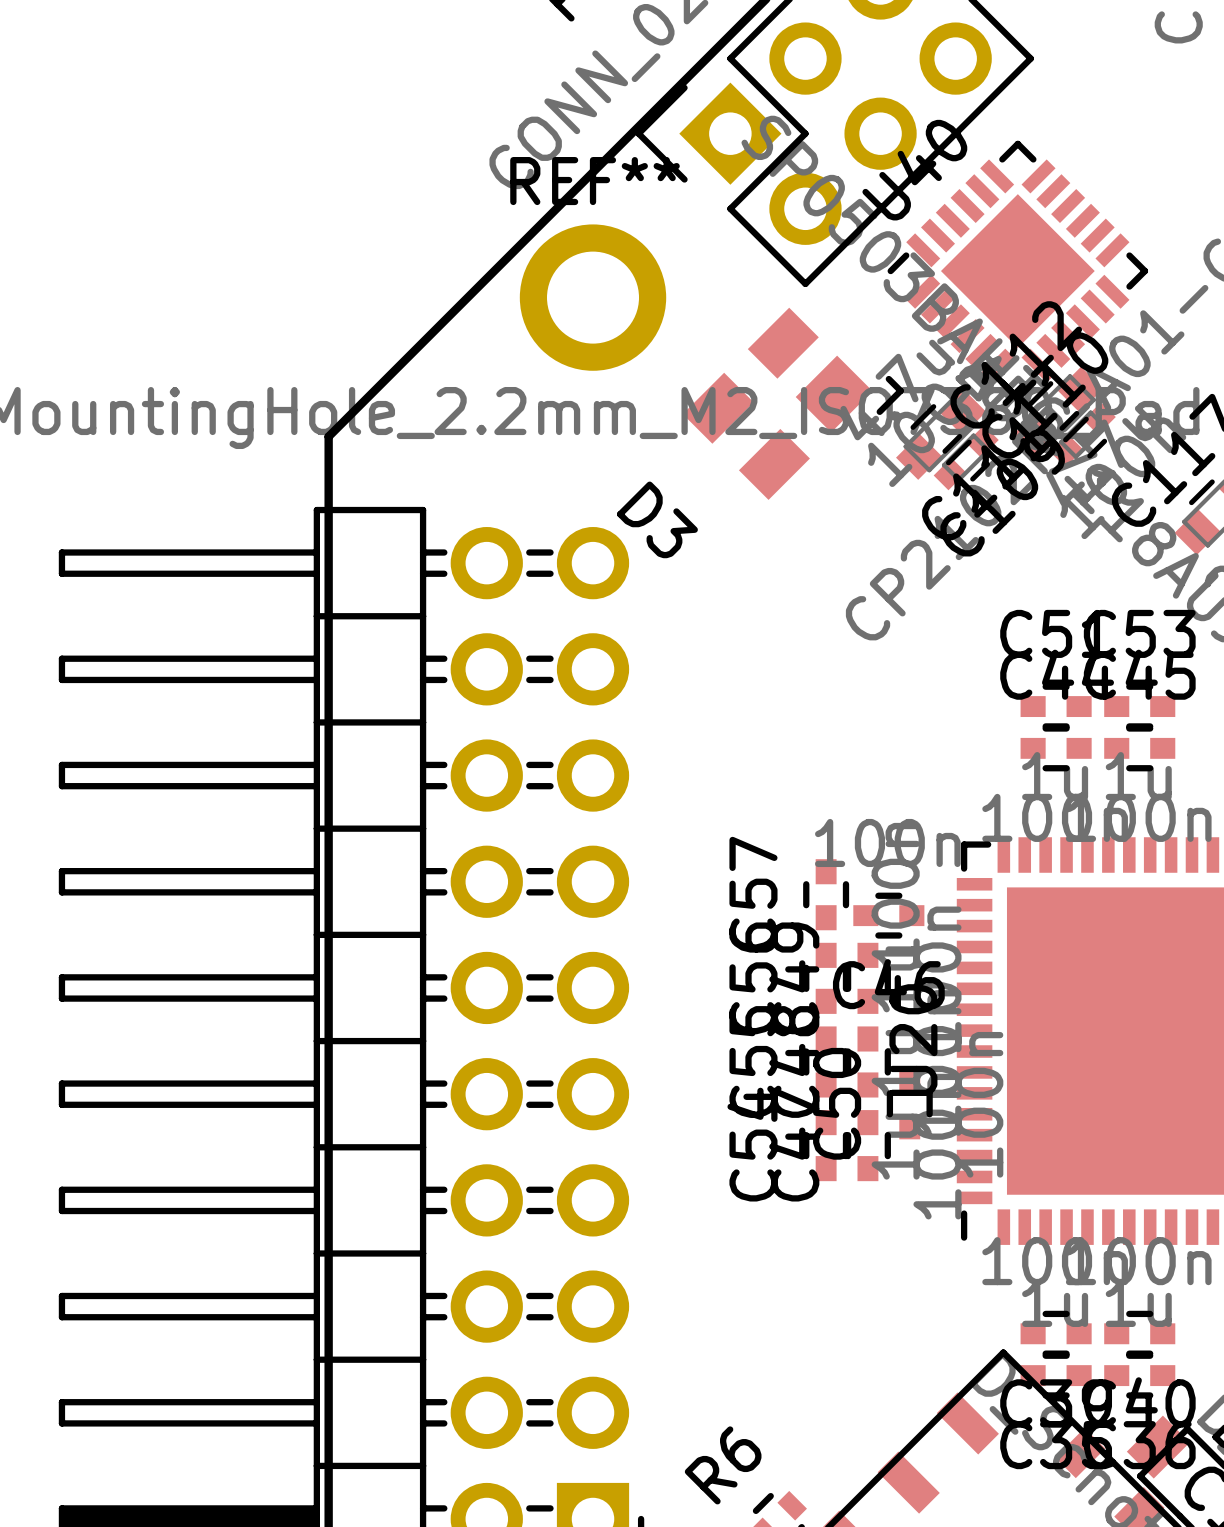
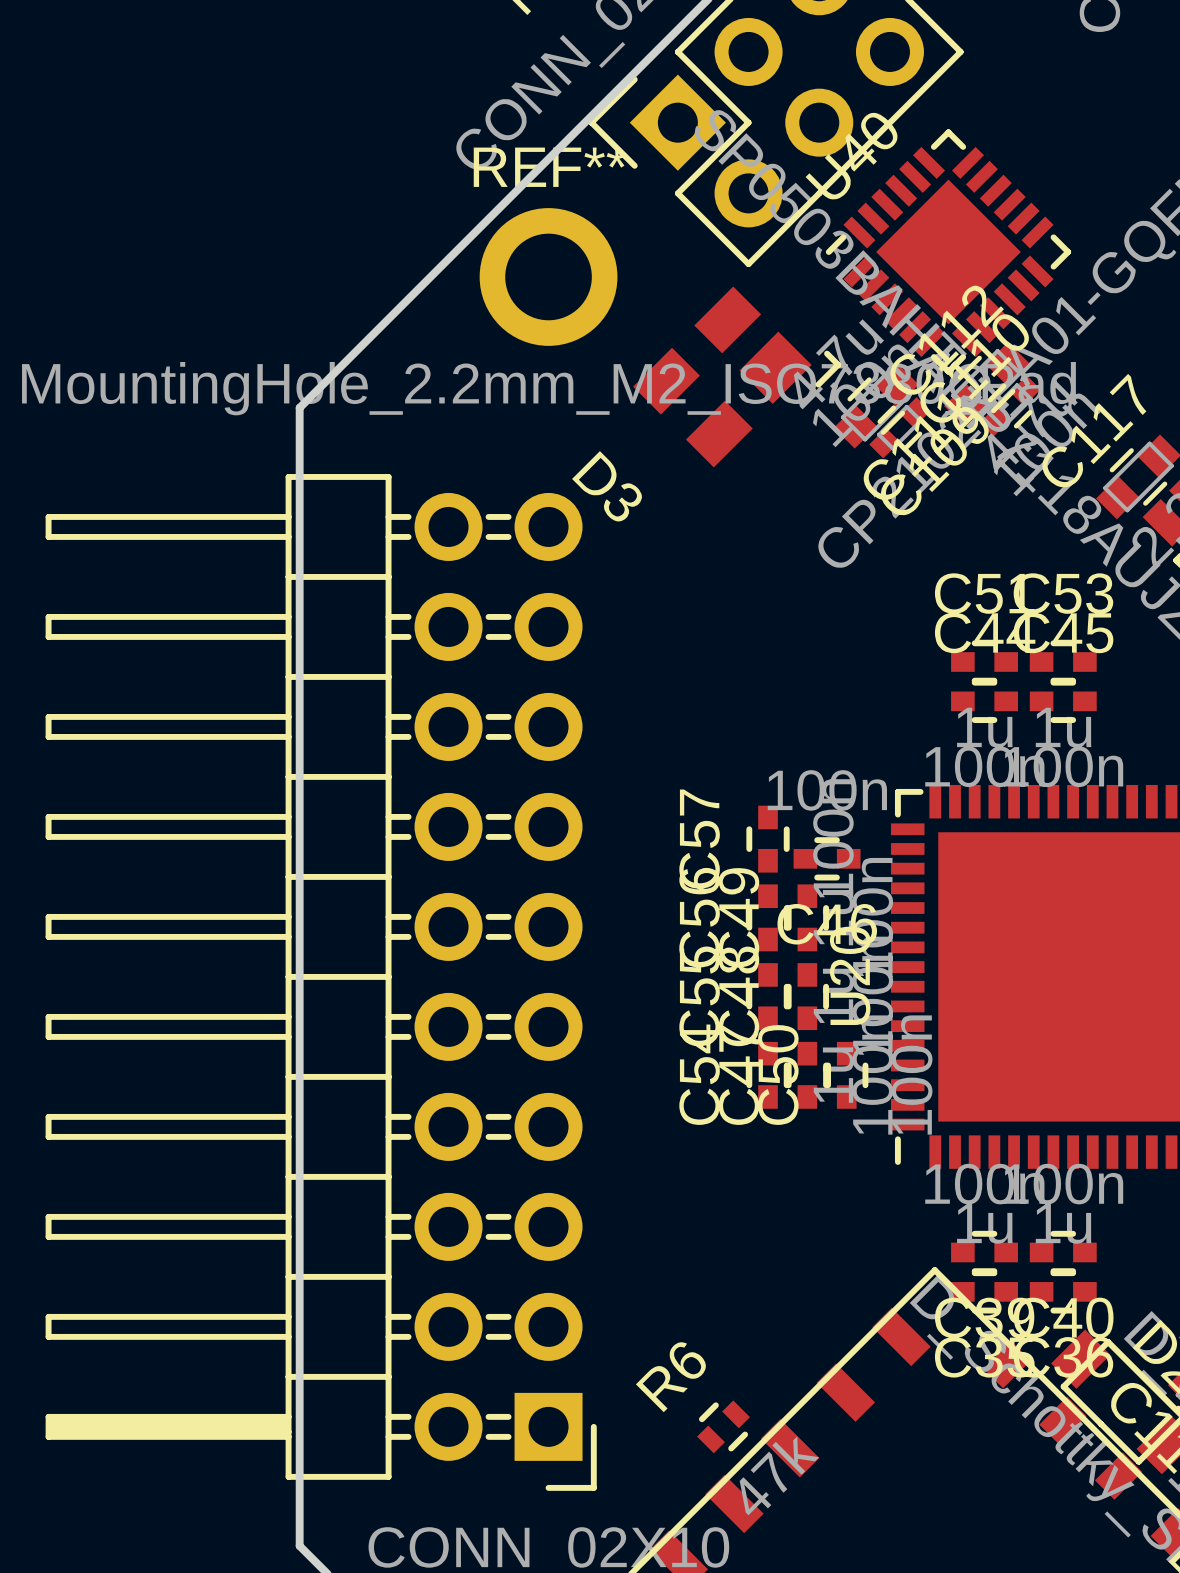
C50 position: (909, 1103) -> (846, 1075)

